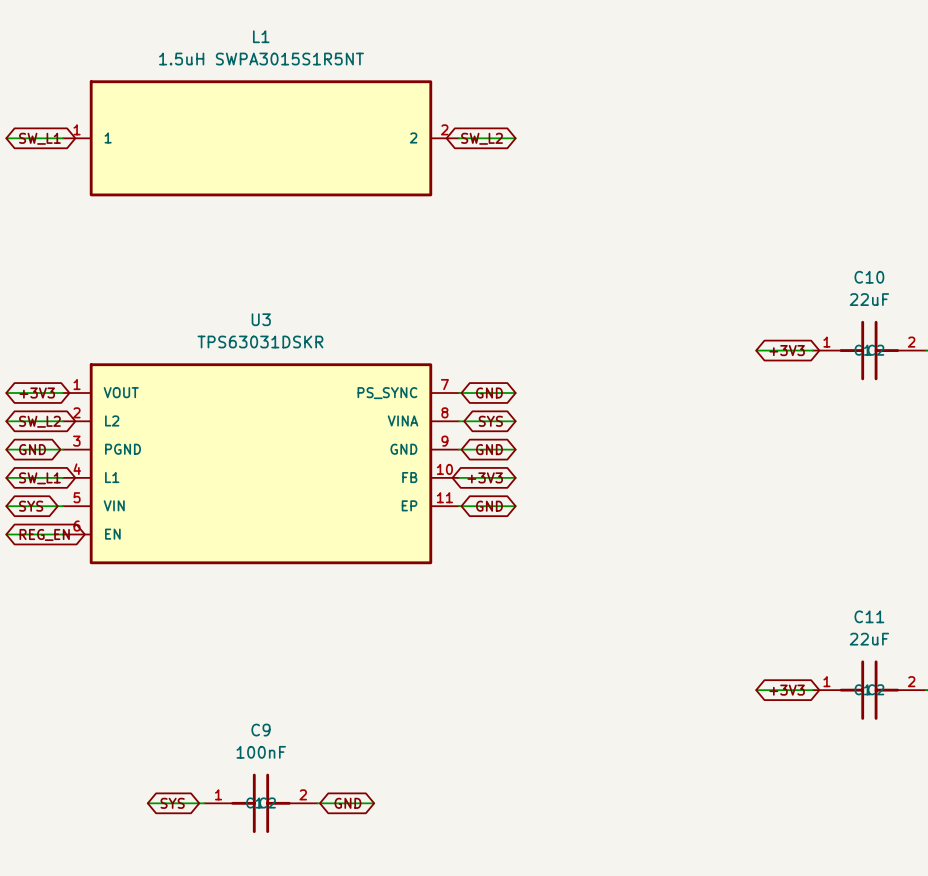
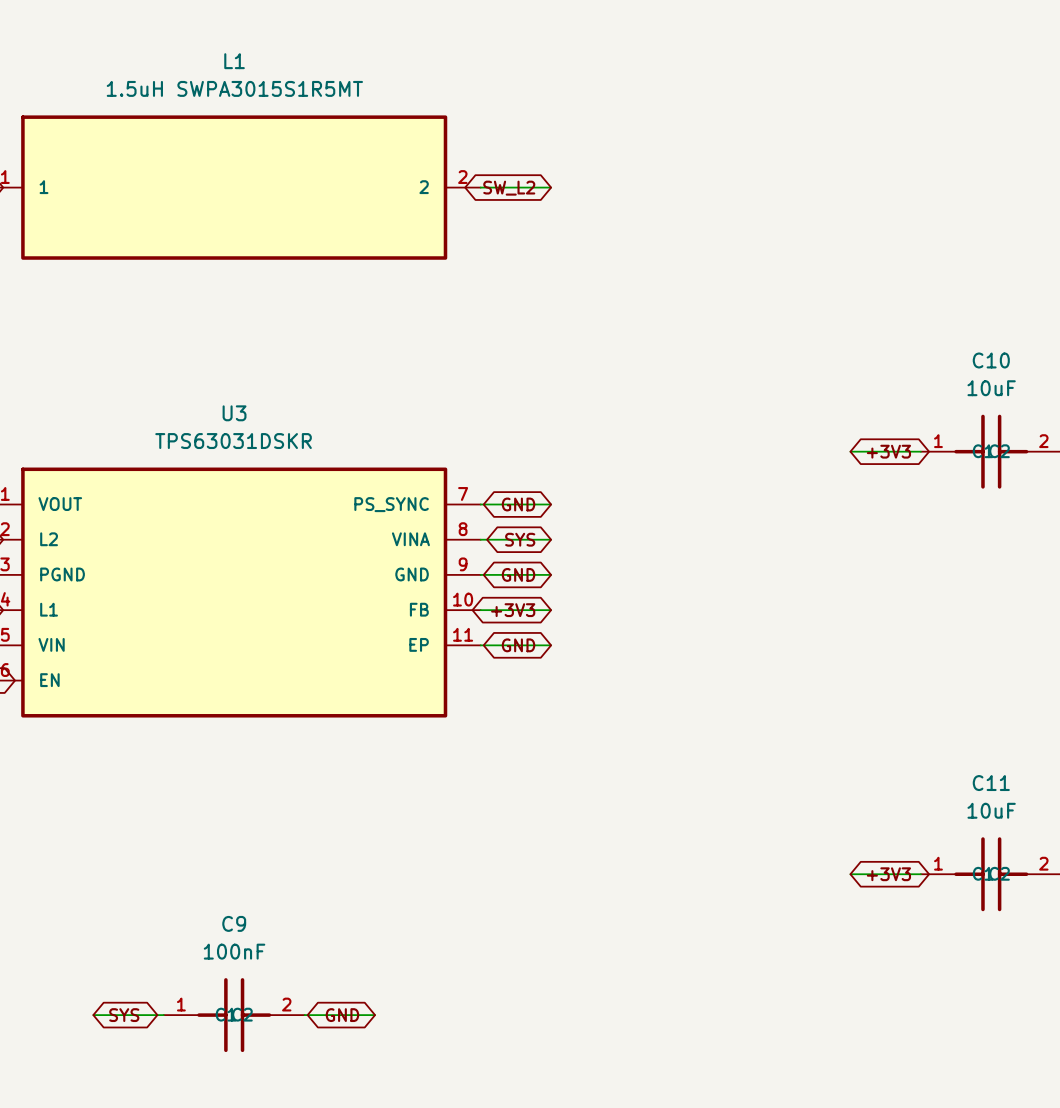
L1 value: 1.5uH SWPA3015S1R5NT (261, 59) -> 1.5uH SWPA3015S1R5MT (234, 88)
C10 value: 22uF (869, 299) -> 10uF (991, 388)
C11 value: 22uF (869, 639) -> 10uF (991, 810)

